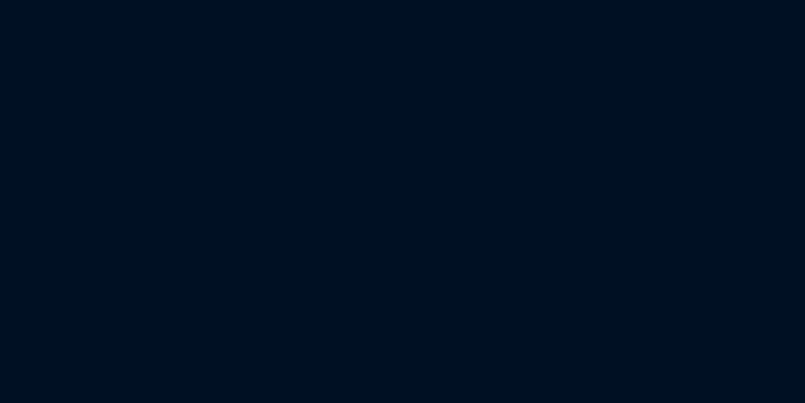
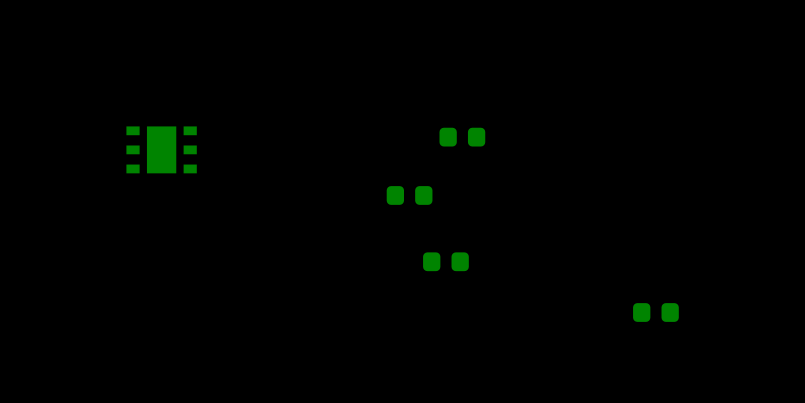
part: none -> (462, 137)
part: none -> (161, 149)
part: none -> (409, 195)
part: none -> (445, 261)
part: none -> (655, 312)

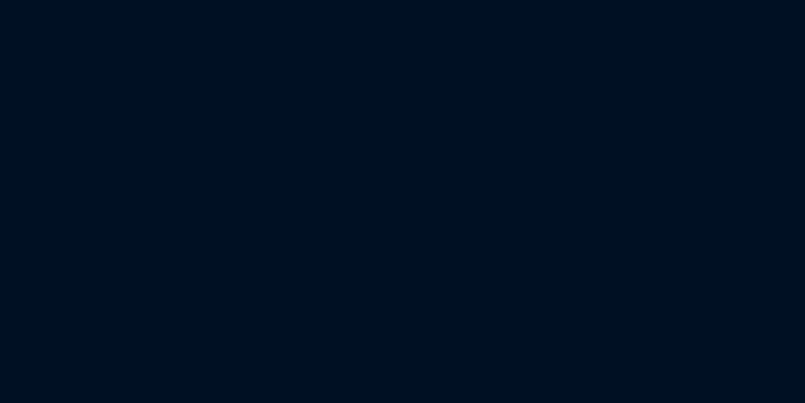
part: (462, 137) -> none
part: (161, 149) -> none
part: (409, 195) -> none
part: (445, 261) -> none
part: (655, 312) -> none

